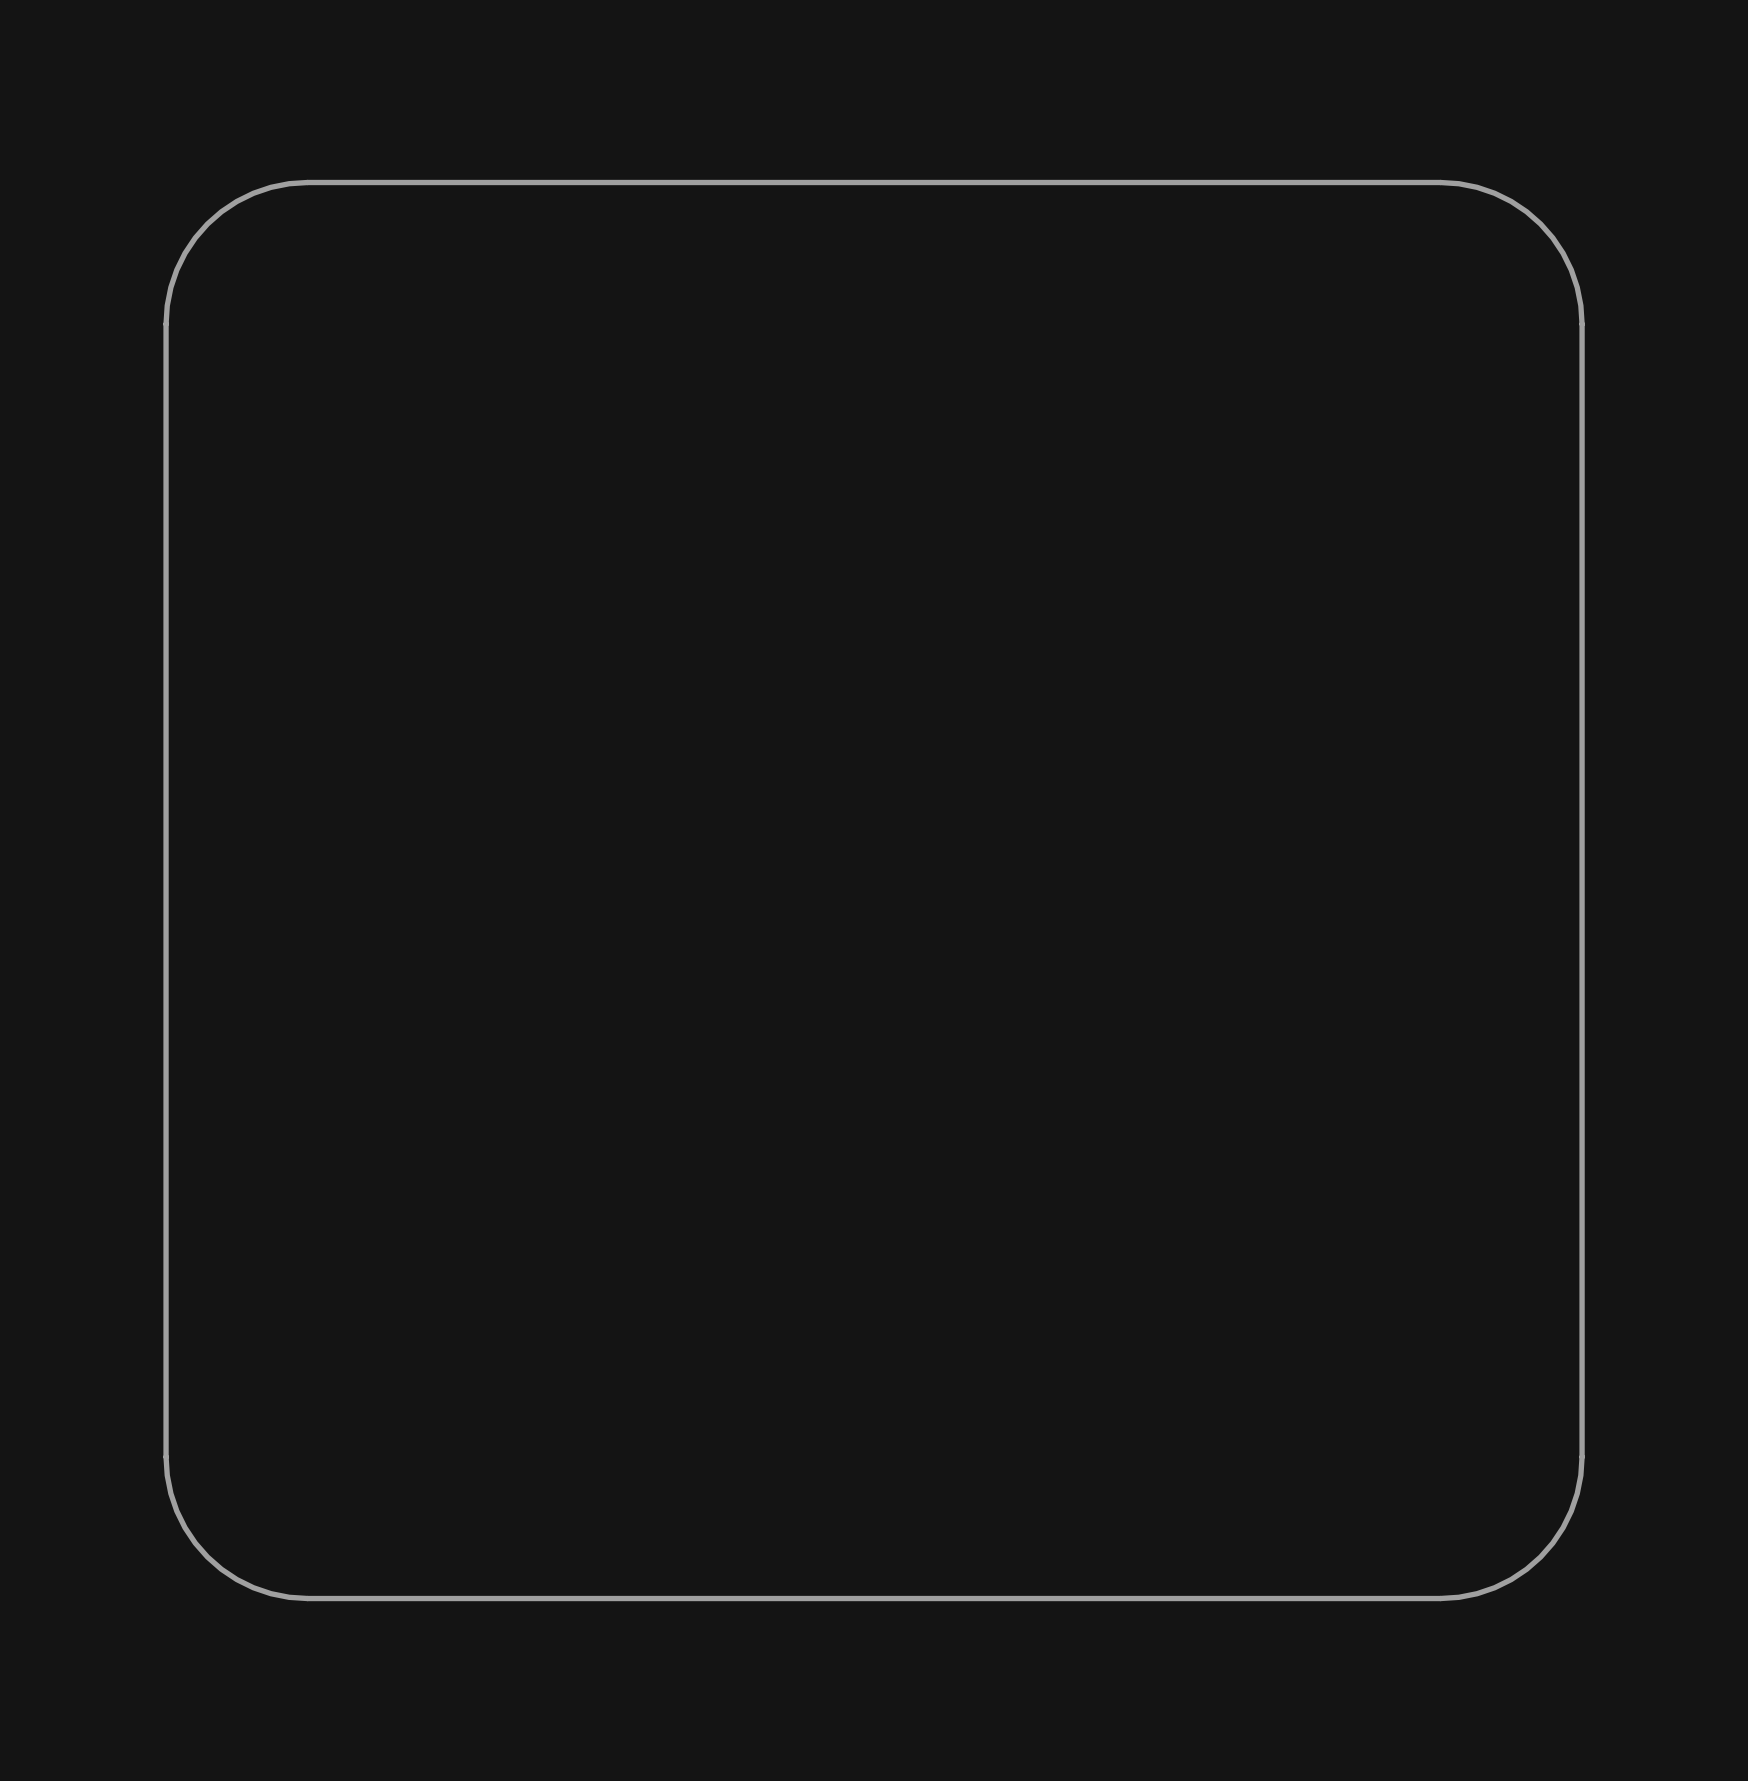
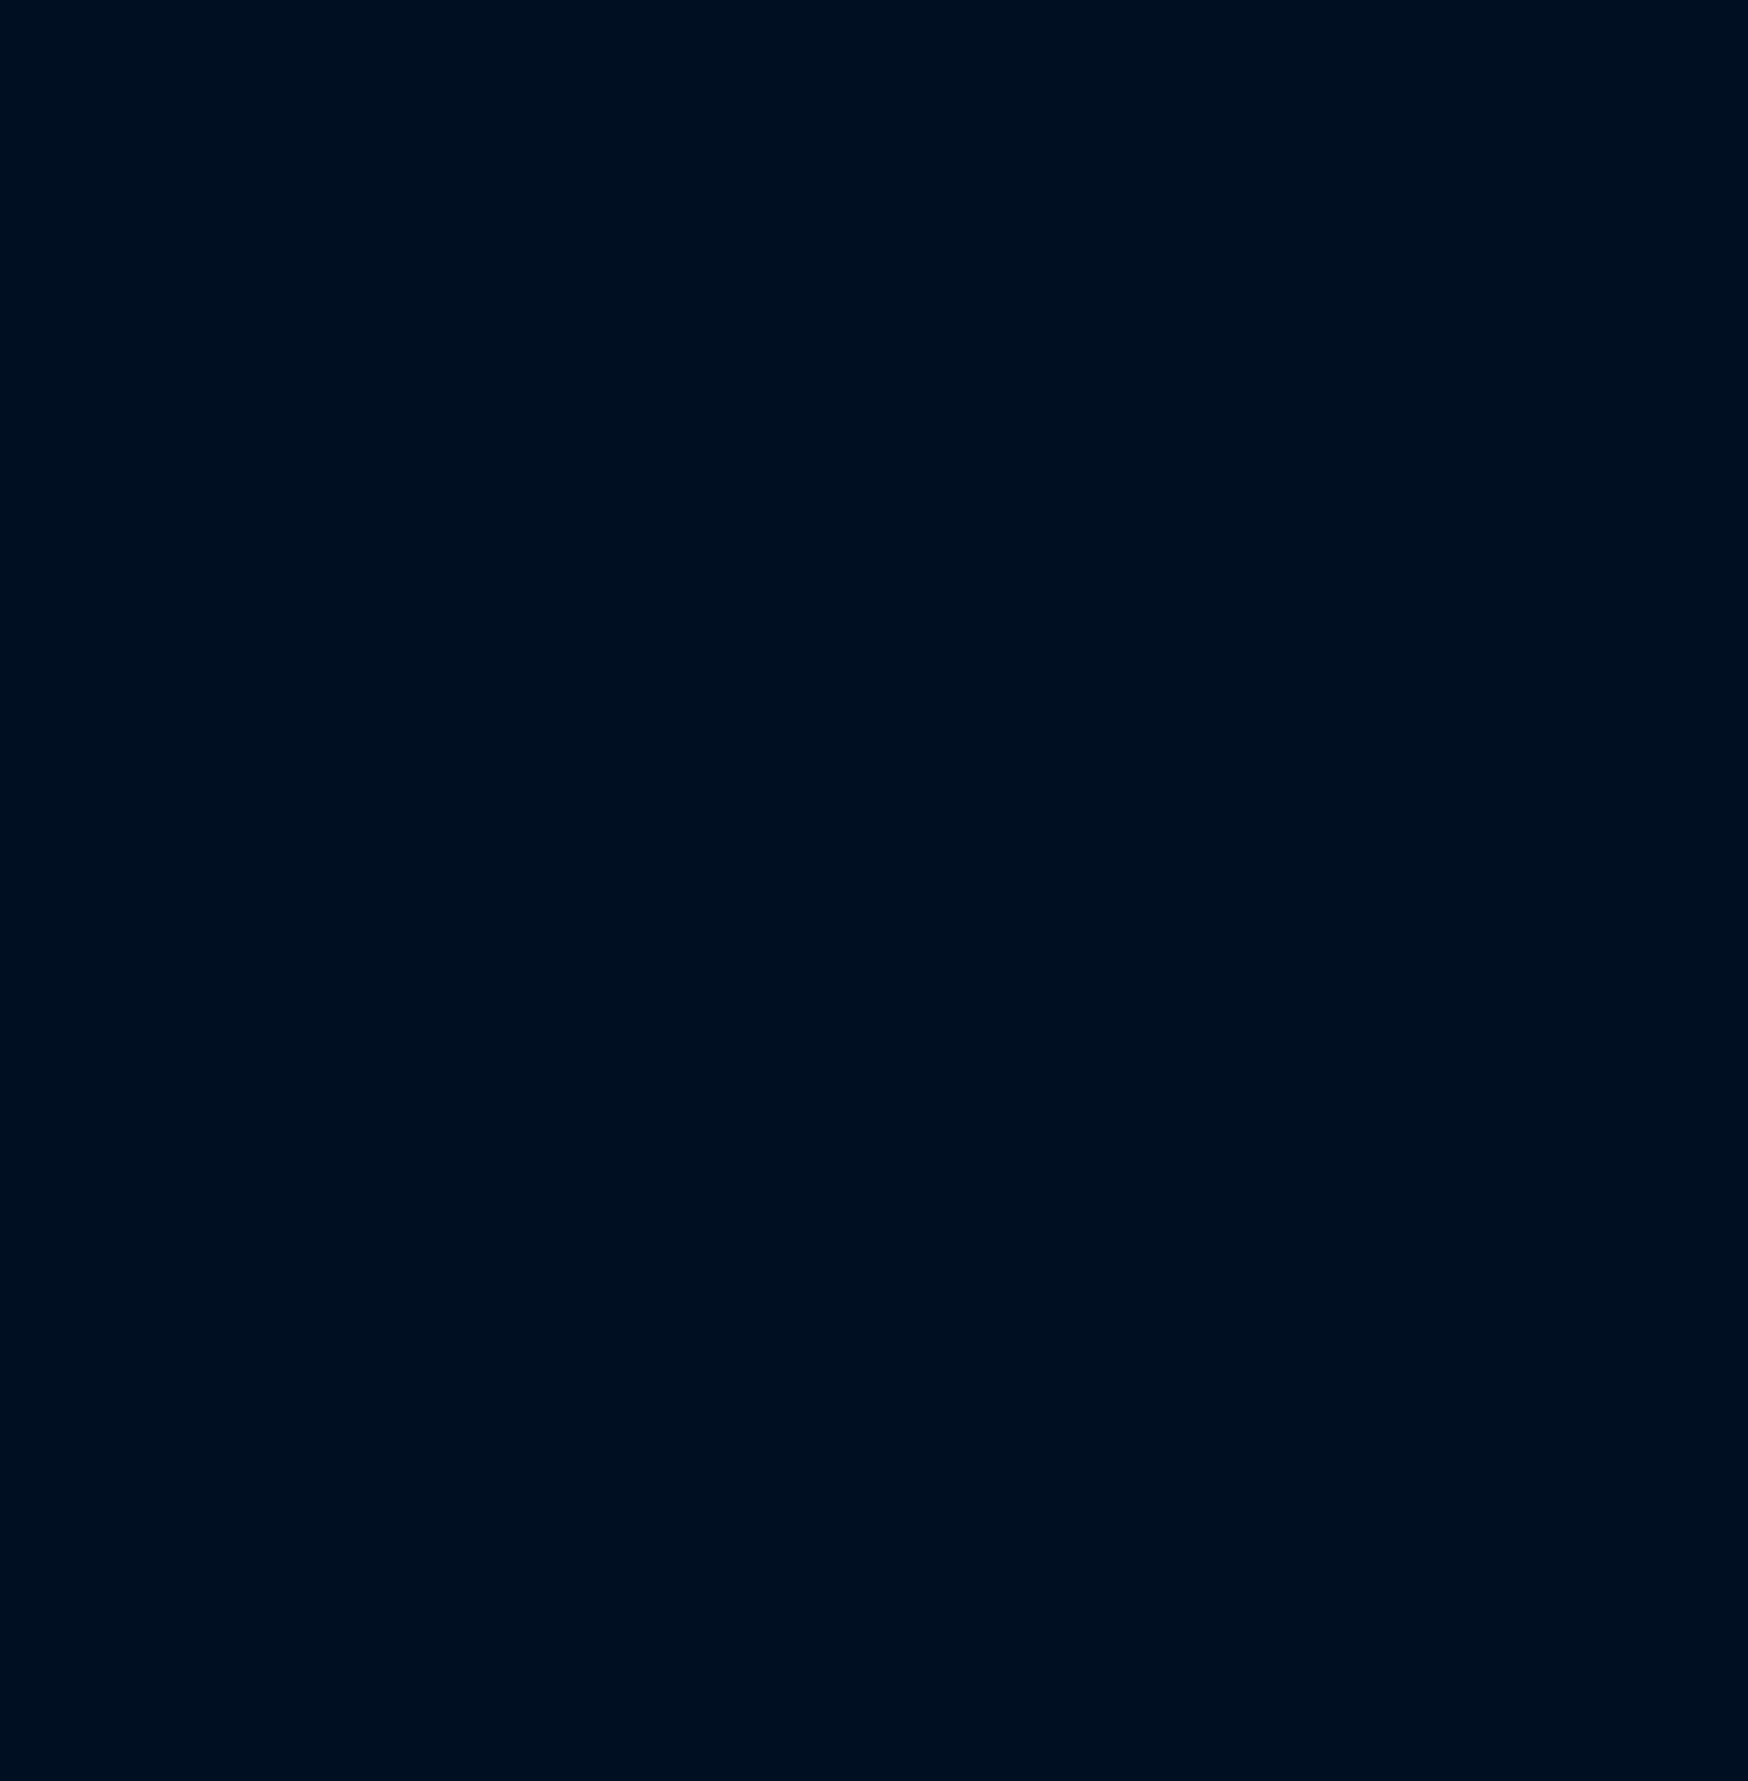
board edge: (307, 182) (1440, 182) (1458, 183) (1494, 193) (1511, 201) (1540, 223) (1563, 253) (1571, 269) (1580, 305) (1582, 324) (1582, 1456) (1577, 1493) (1571, 1511) (1563, 1527) (1540, 1557) (1511, 1579) (1494, 1587) (1477, 1593) (1440, 1598) (307, 1598) (271, 1593) (253, 1587) (221, 1569) (207, 1557) (195, 1543) (176, 1511) (170, 1493) (166, 1456) (167, 305) (176, 269) (195, 237) (207, 223) (221, 211) (253, 193) (271, 187) (307, 182) -> none

